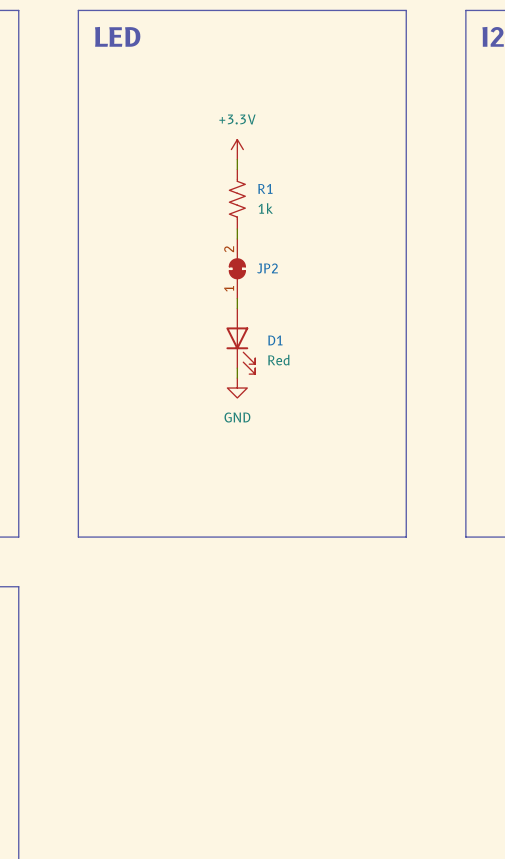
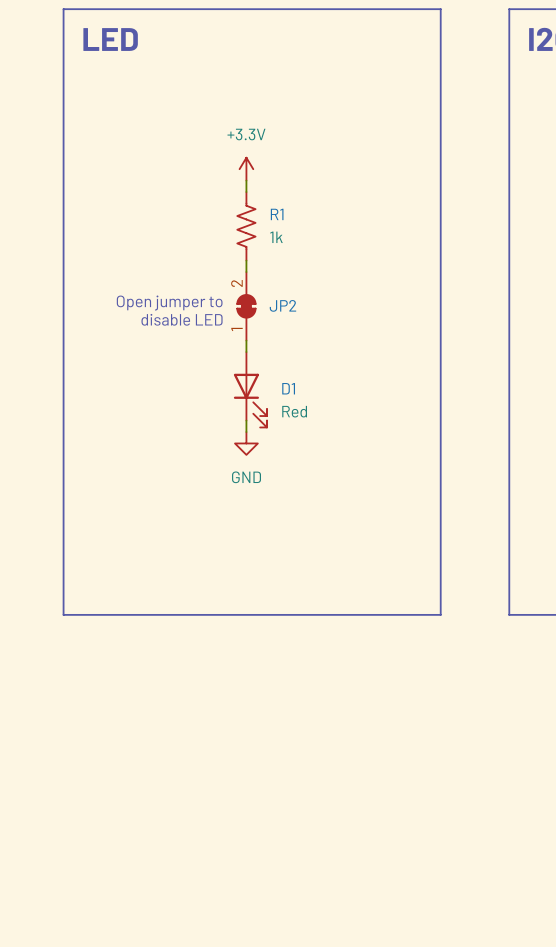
text: none -> Open jumper to (169, 303)
text: none -> disable LED (182, 319)

